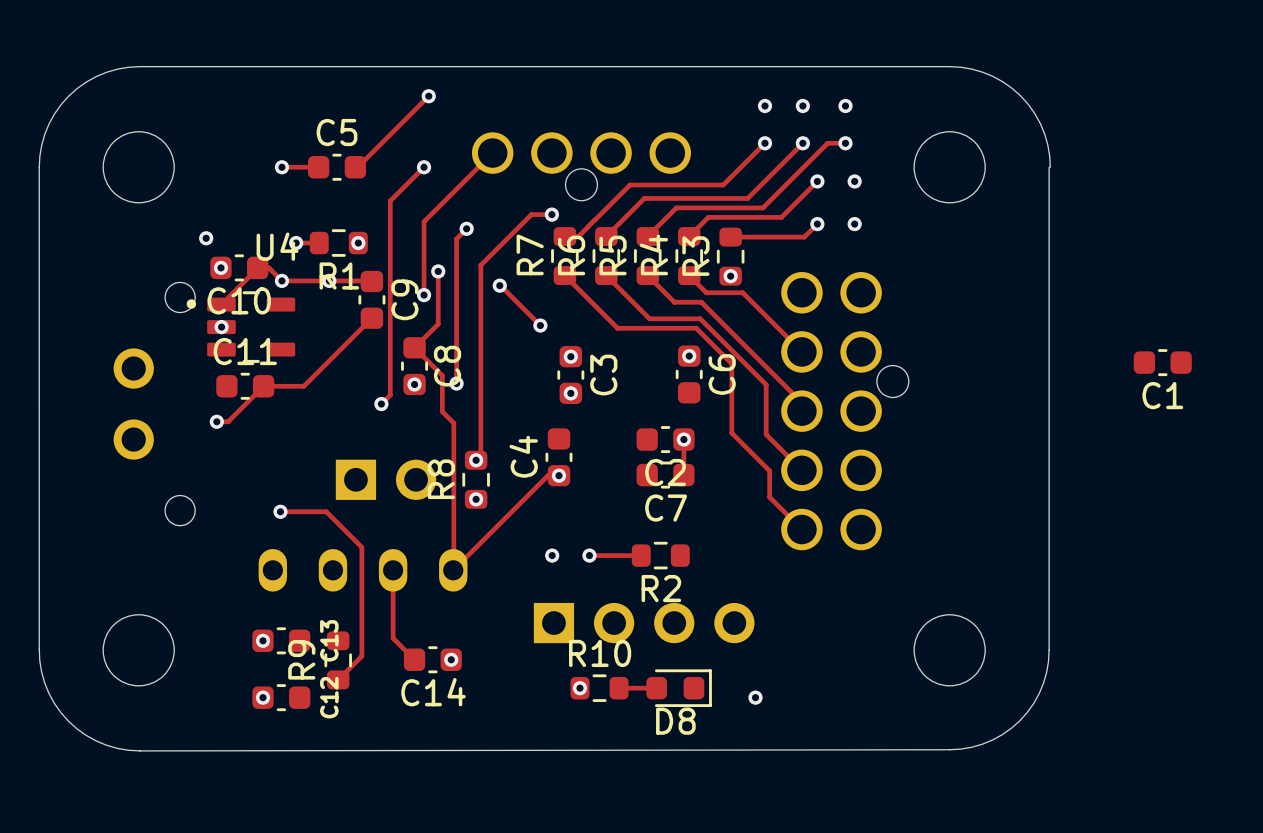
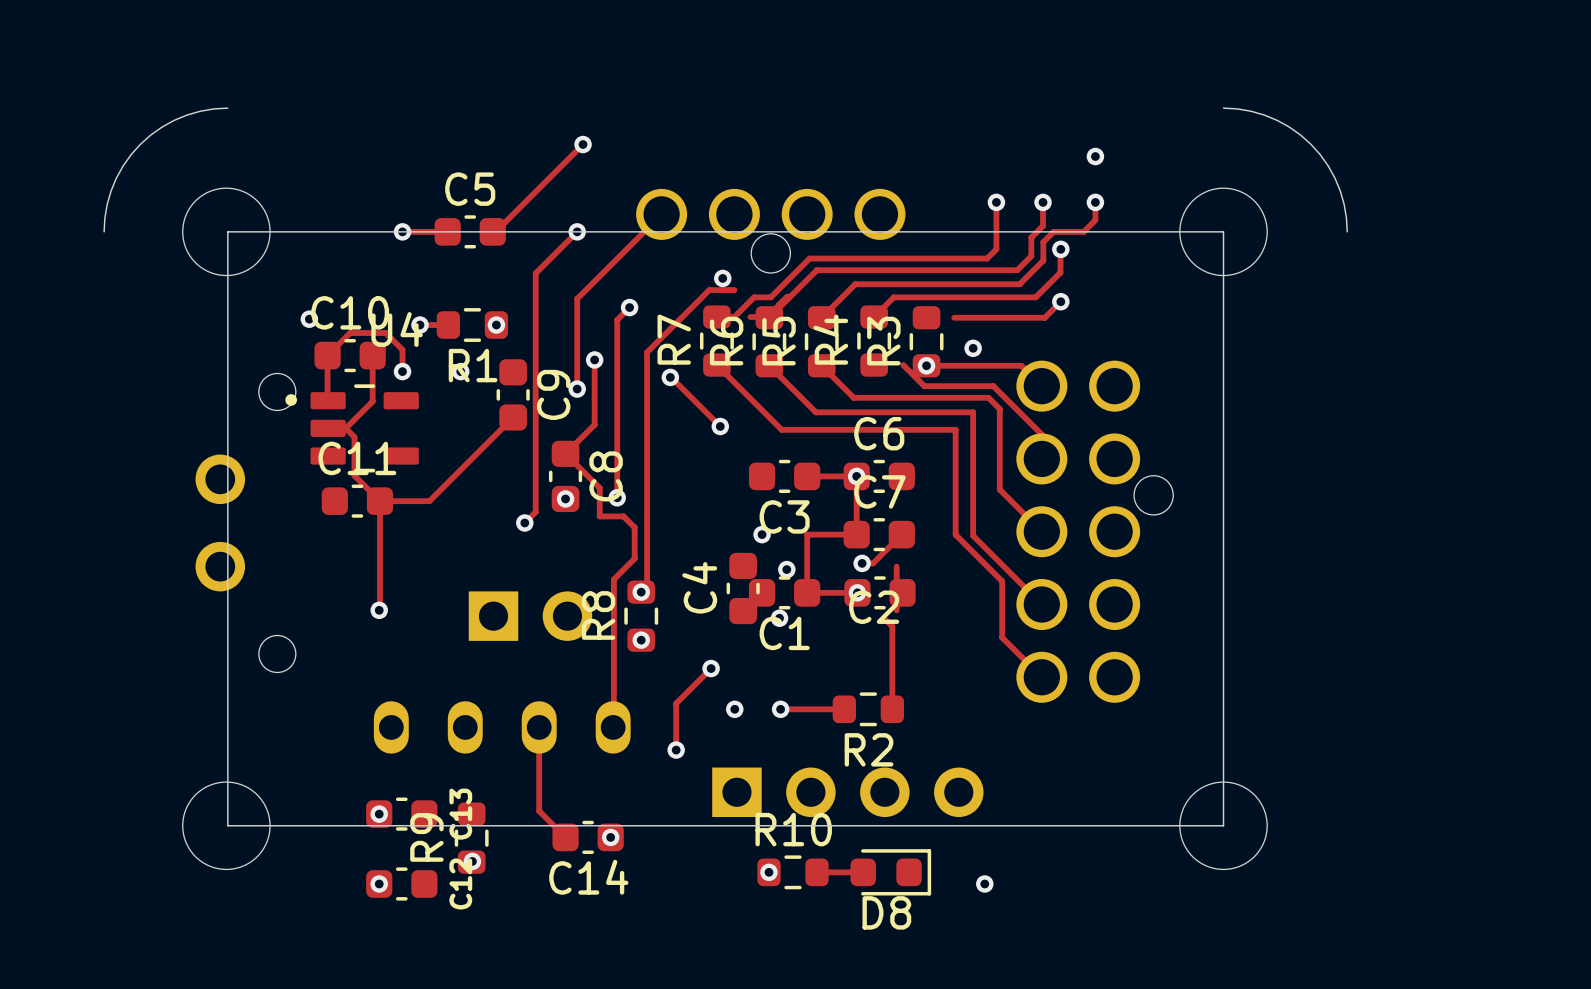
board edge: (139, 66) (949, 66) -> none
via: (764, 105) -> none
via: (802, 105) -> none
track: (764, 143) (723, 185) (630, 185) (595, 219) -> (996, 202) (996, 249) (987, 258) (809, 258) (770, 297) (754, 297) (734, 317) (716, 317)
track: (802, 143) (747, 198) -> (1043, 202) (1043, 225) (1031, 237) (1031, 256) (1017, 270) (975, 270)
track: (845, 143) (827, 143) (762, 207) (676, 207) (647, 236) -> (1095, 202) (1095, 220) (1083, 231) (1053, 231) (1043, 242) (1043, 260) (1019, 284) (855, 284) (821, 317)
board edge: (39, 167) (39, 648) (41, 671) (54, 703) (76, 728) (106, 745) (139, 750) (949, 749) (982, 744) (1002, 734) (1020, 720) (1033, 703) (1043, 683) (1048, 661) (1049, 167) -> none
board edge: none -> (227, 231) (1223, 231) (1223, 825) (227, 825) (227, 231)
track: (817, 181) (781, 217) (708, 217) (689, 236) -> (1060, 249) (1060, 272) (1035, 297) (893, 297) (874, 317)
via: (854, 181) -> none
track: (644, 198) (606, 236) -> (848, 270) (816, 270) (769, 317)
via position: (551, 214) -> (722, 278)
via: (854, 224) -> none
R7 position: (564, 256) -> (716, 341)
R6 position: (606, 256) -> (769, 341)
R5 position: (647, 256) -> (821, 341)
R4 position: (689, 256) -> (874, 341)
R3 position: (730, 256) -> (926, 341)
via: none -> (973, 348)
via: (220, 267) -> none
track: (257, 267) (268, 267) (281, 280) (371, 281) -> none
track: (257, 268) (221, 304) -> (372, 356) (372, 401) (345, 428)
track: (564, 275) (617, 328) -> (716, 365) (781, 429) (815, 429)
track: (606, 275) (649, 318) (700, 318) (766, 384) (766, 434) -> (769, 365) (815, 412) (973, 412) (973, 535) (997, 560)
track: (647, 275) (674, 302) -> (821, 365) (853, 397) (885, 397)
track: none -> (926, 365) (1021, 365) (1041, 386)
via: none -> (926, 365)
via: (730, 276) -> none
track: none -> (402, 371) (402, 349) (385, 333) (350, 333) (327, 355) (327, 400)
track: (742, 292) (801, 351) -> (969, 386) (993, 386) (1041, 434) (1041, 458)
C10 name position: C10 (239, 300) -> C10 (350, 312)
track: (701, 302) (801, 402) (801, 411) -> (918, 397) (988, 397) (999, 409) (999, 489) (1041, 531)
via: (221, 327) -> none
track: none -> (345, 428) (354, 437) (354, 475) (379, 501) (379, 610)
track: (696, 328) (731, 363) -> (912, 429) (955, 429) (955, 473)
via: (570, 356) -> none
via position: (689, 356) -> (856, 476)
C1 position: (1162, 362) -> (784, 592)
track: none -> (807, 476) (856, 476) (856, 534) (807, 534) (807, 592) (857, 592)
C6 rotation: 0° (689, 374) -> 90° clockwise (879, 476)
C6 name position: C6 (722, 374) -> C6 (879, 433)
C3 rotation: 0° (570, 375) -> 90° clockwise (784, 476)
track: (263, 386) (228, 421) (216, 421) -> none
via position: (570, 393) -> (762, 534)
track: (442, 398) (442, 411) (453, 423) (453, 449) -> (599, 516) (623, 516) (634, 527) (634, 558) (613, 579)
track: none -> (901, 534) (873, 563) (862, 563)
track: (731, 413) (731, 433) (769, 470) -> (955, 534) (1002, 581) (1002, 605)
via: (216, 421) -> none
via: none -> (862, 563)
C2 position: (665, 439) -> (879, 592)
via: (683, 439) -> none
via: none -> (786, 569)
via: none -> (857, 592)
via: none -> (379, 610)
track: (558, 475) (547, 475) (453, 570) -> none
via: (558, 475) -> none
C7 position: (665, 475) -> (879, 534)
via: none -> (779, 618)
track: none -> (885, 619) (892, 626) (892, 709)
C7 name position: C7 (666, 508) -> C7 (879, 491)
track: (280, 511) (326, 511) (361, 547) (361, 656) (338, 679) -> none
via: (280, 511) -> none
track: none -> (711, 668) (676, 703) (676, 750)
via: none -> (711, 668)
via: none -> (676, 750)
via: none -> (472, 861)

